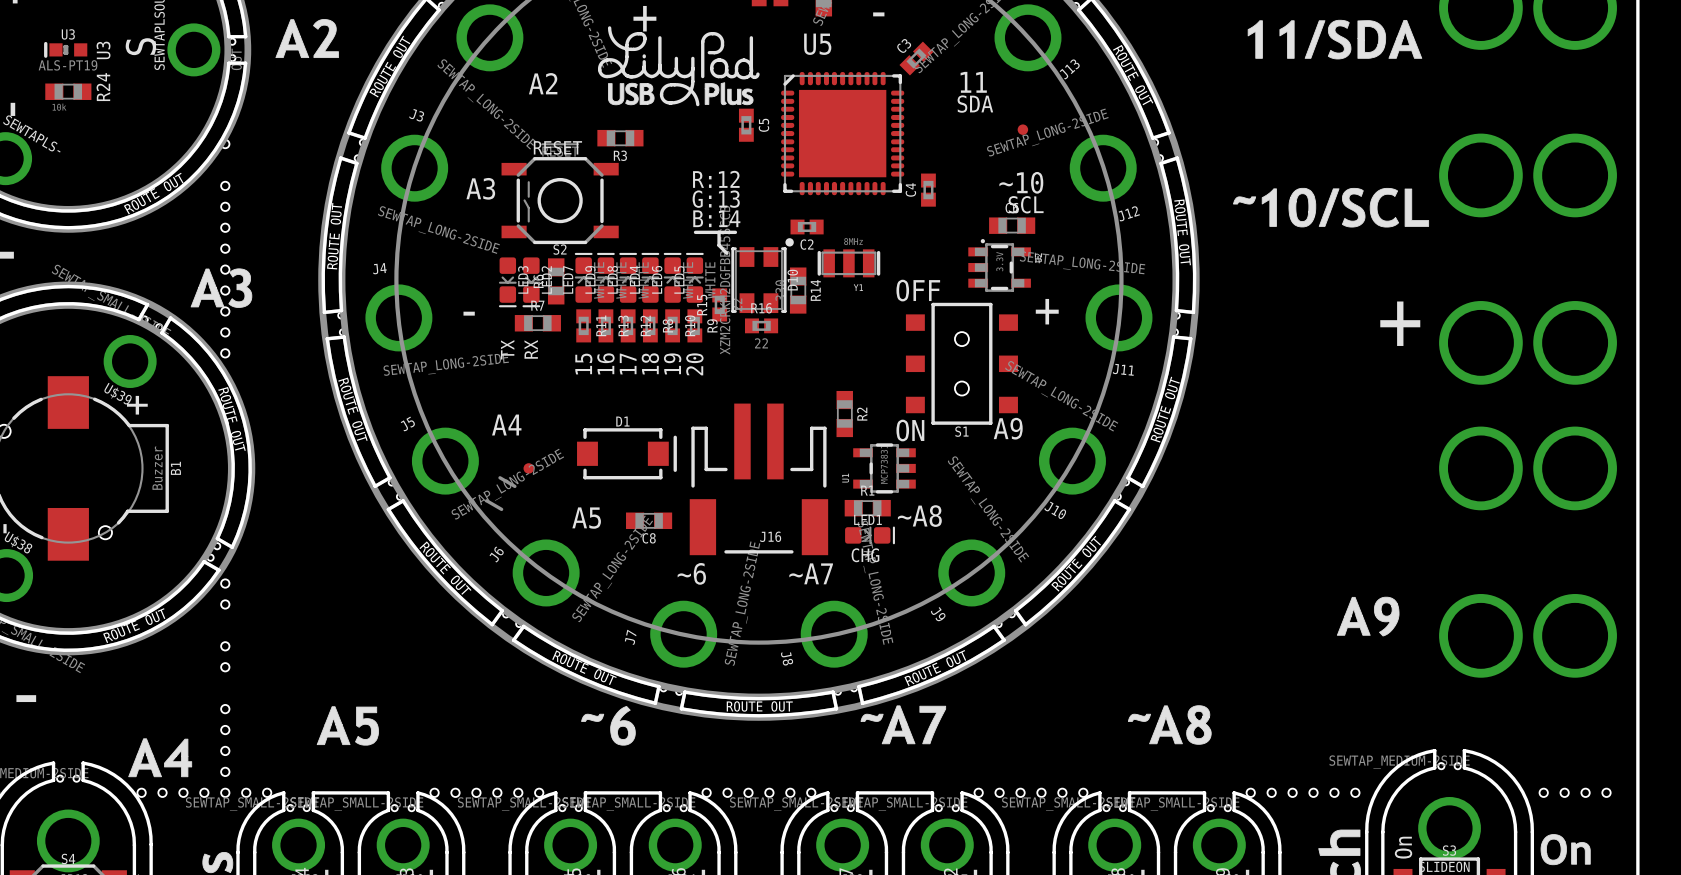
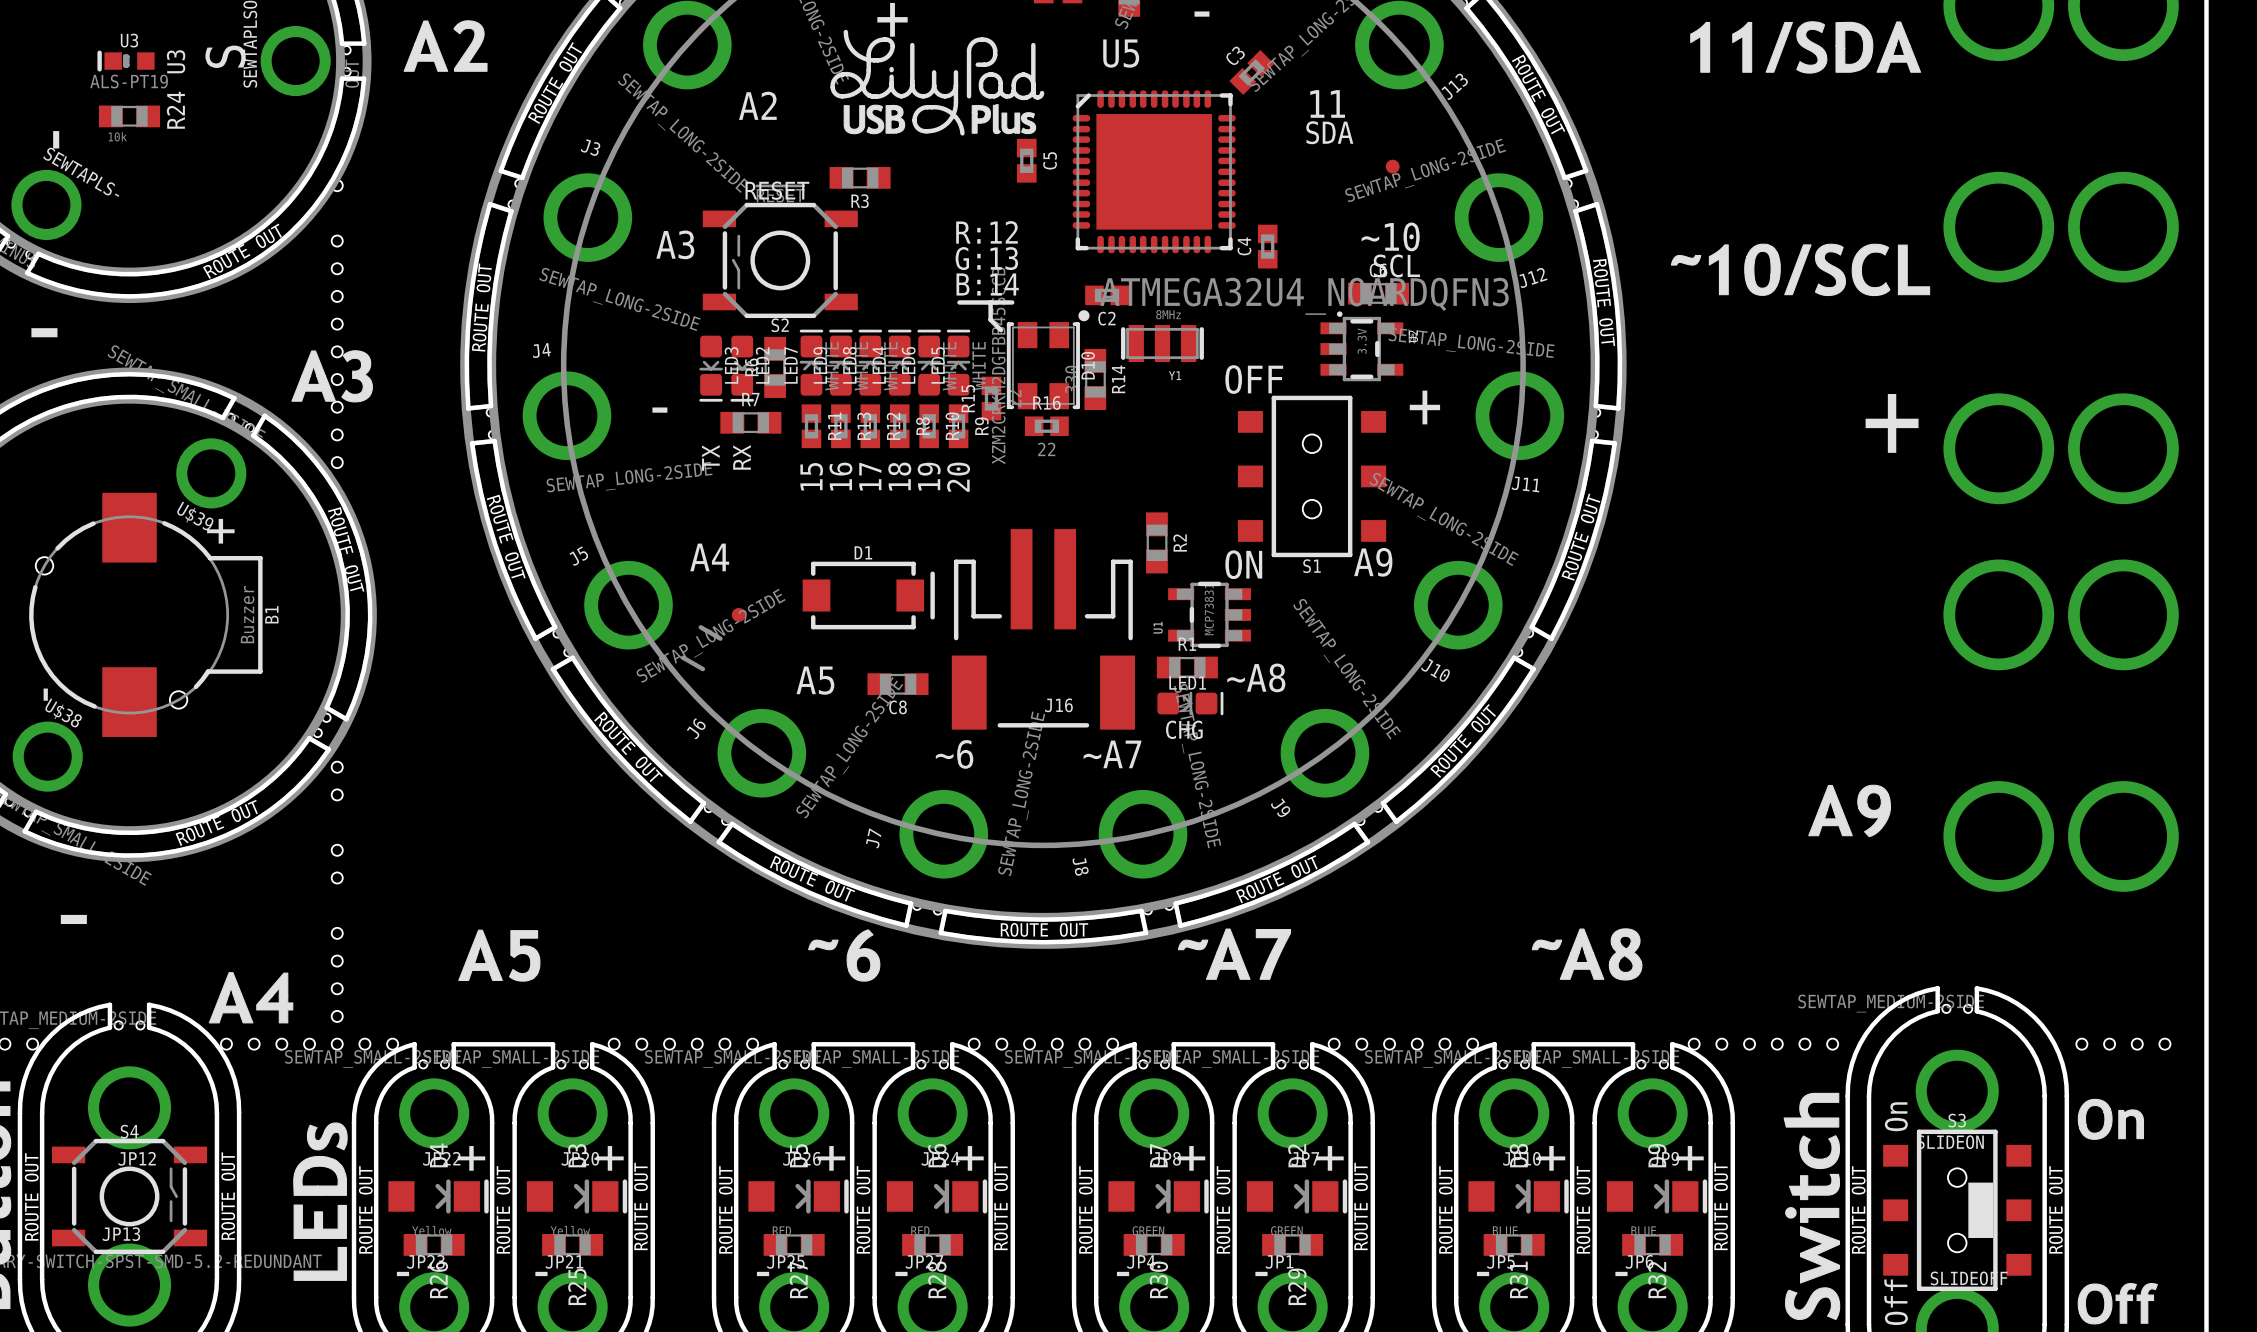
U5 value: none -> ATMEGA32U4_NOARDQFN3 (1304, 296)

